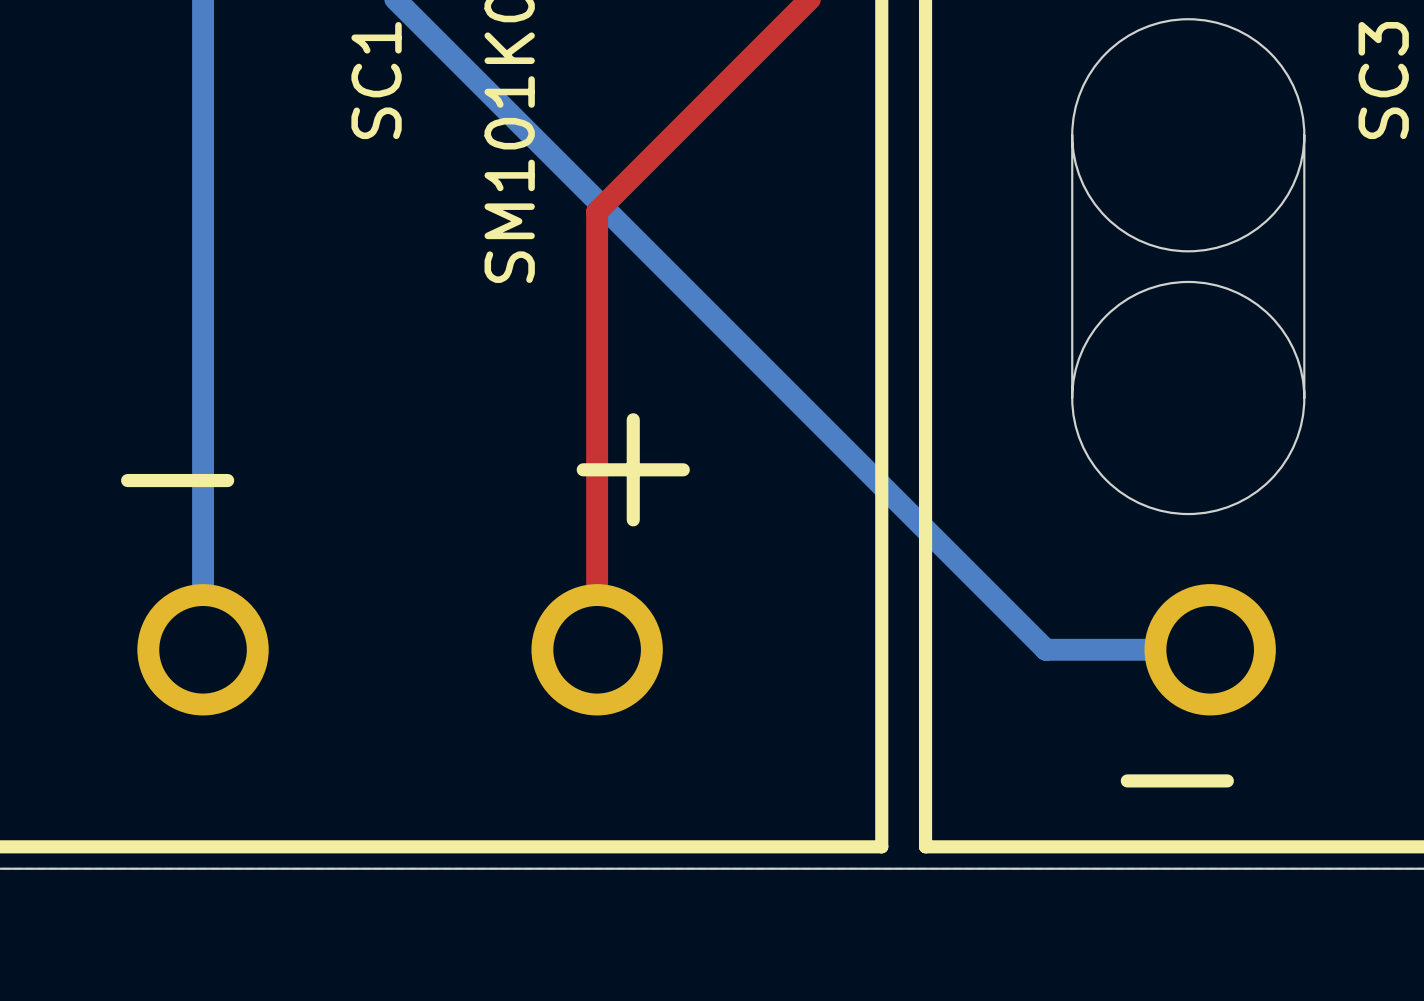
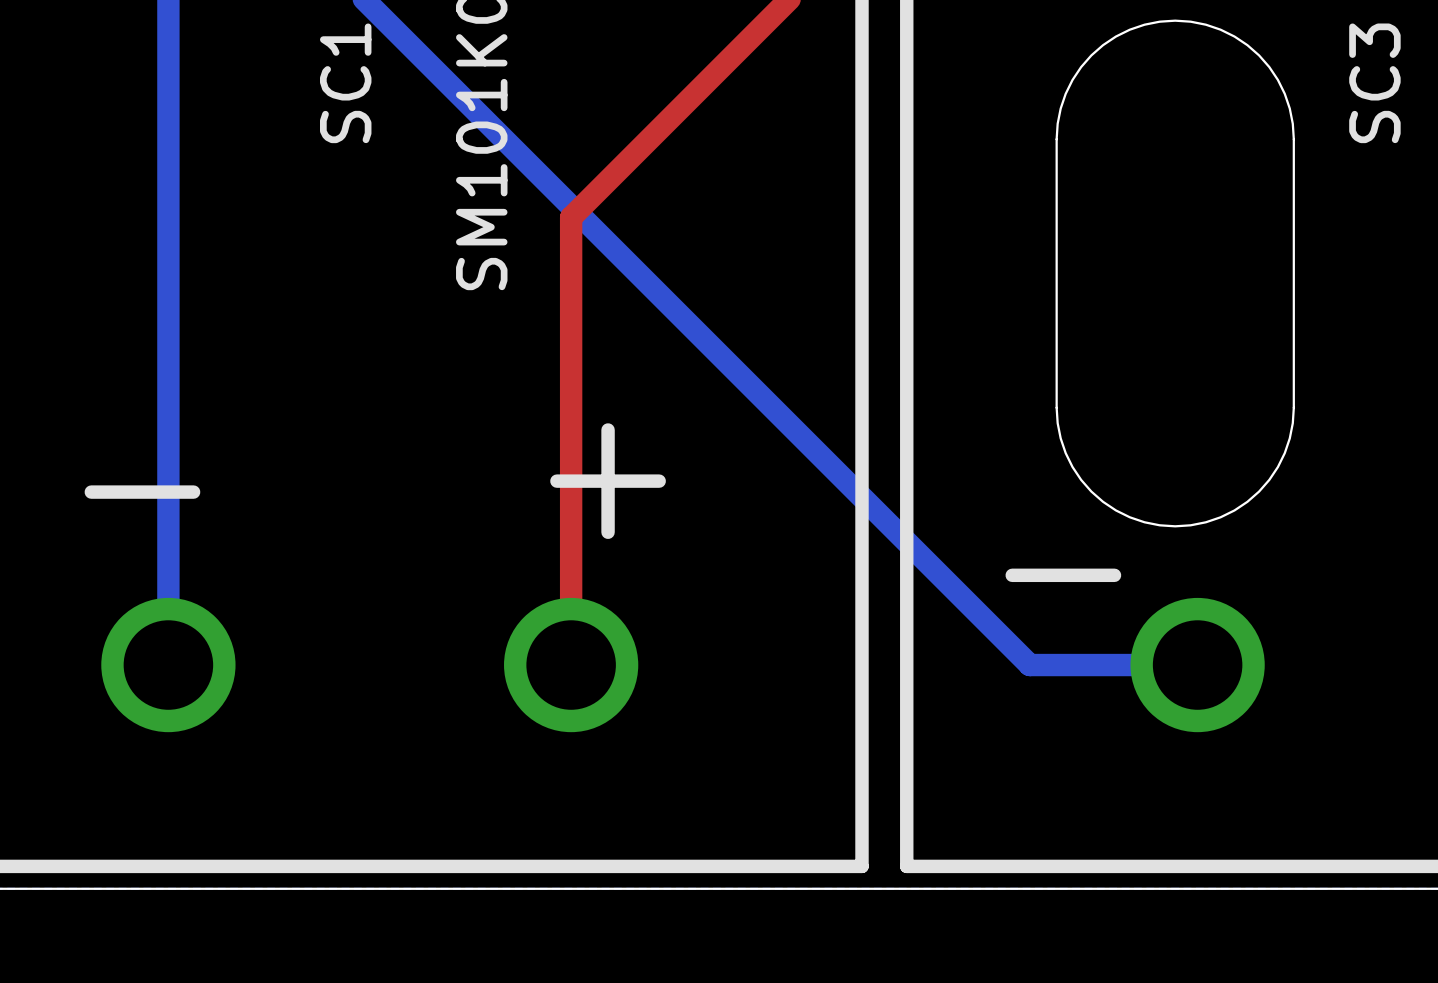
round board edge: [1071, 18, 1306, 253] -> none
board edge: none -> (1056, 139) (1060, 108) (1065, 93) (1081, 67) (1091, 55) (1103, 45) (1129, 29) (1144, 24) (1175, 20) (1205, 24) (1220, 29) (1234, 36) (1259, 55) (1269, 67) (1284, 93) (1289, 108) (1293, 139)
round board edge: [1071, 280, 1306, 516] -> none
board edge: none -> (1056, 407) (1060, 438) (1065, 453) (1081, 479) (1091, 491) (1115, 510) (1129, 517) (1144, 522) (1175, 526) (1205, 522) (1220, 517) (1247, 501) (1259, 491) (1269, 479) (1284, 453) (1289, 438) (1293, 407)
SC3 text position: - (1177, 780) -> - (1063, 575)

